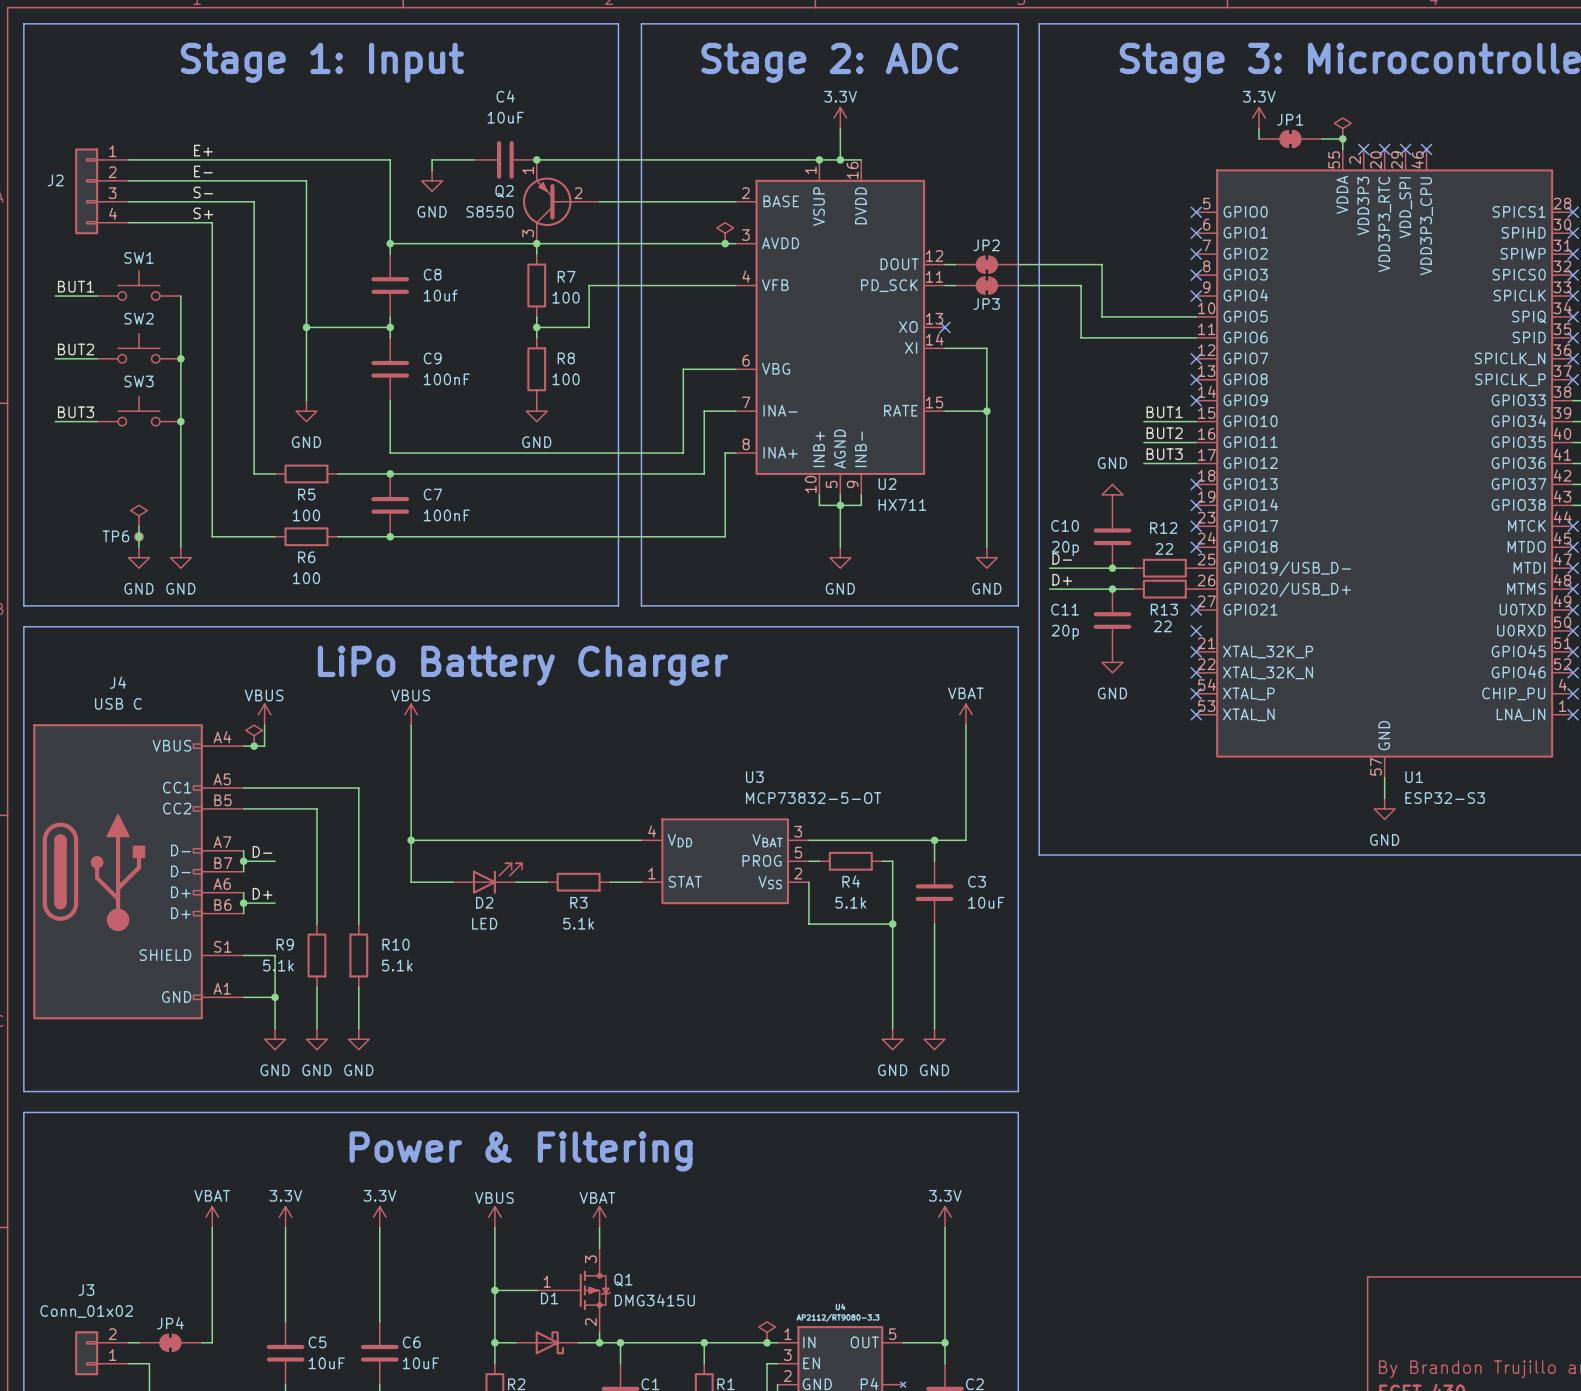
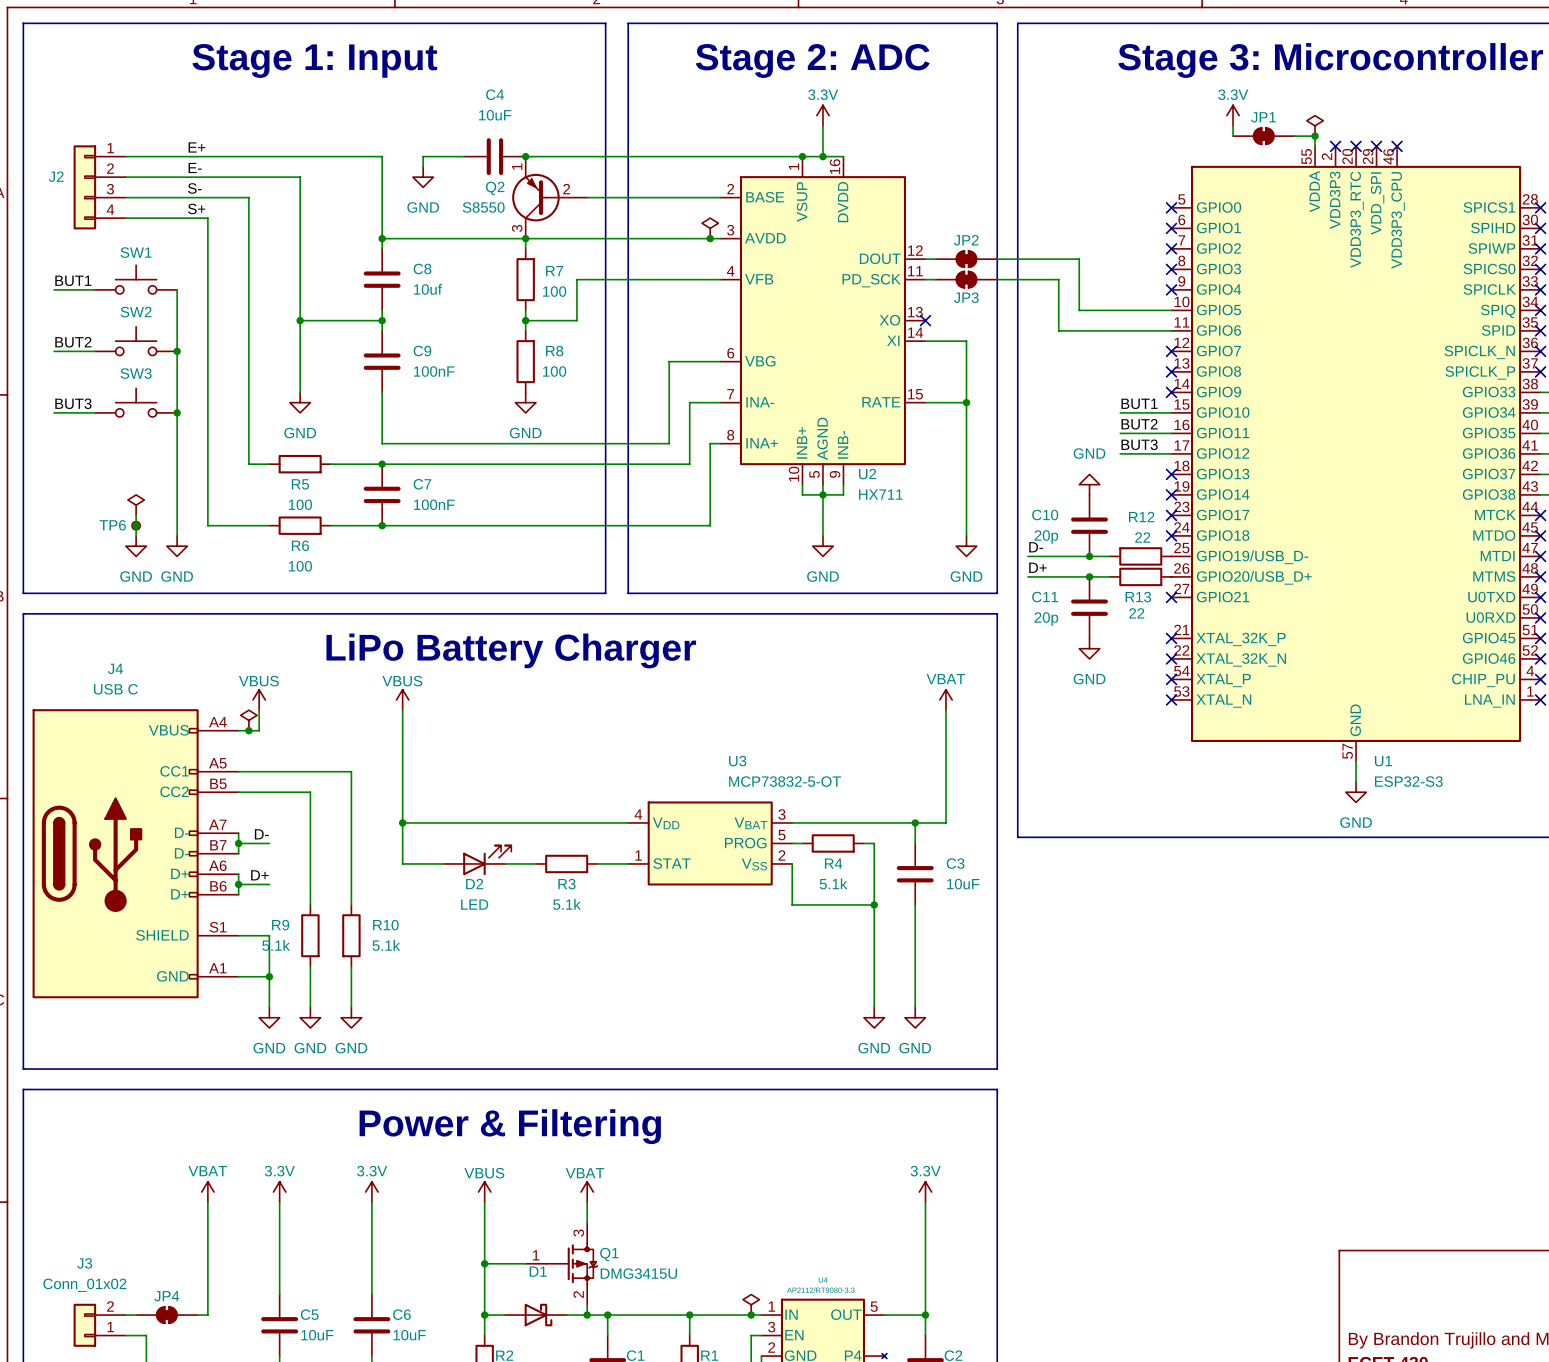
no-connect mark: (1196, 630) -> none

